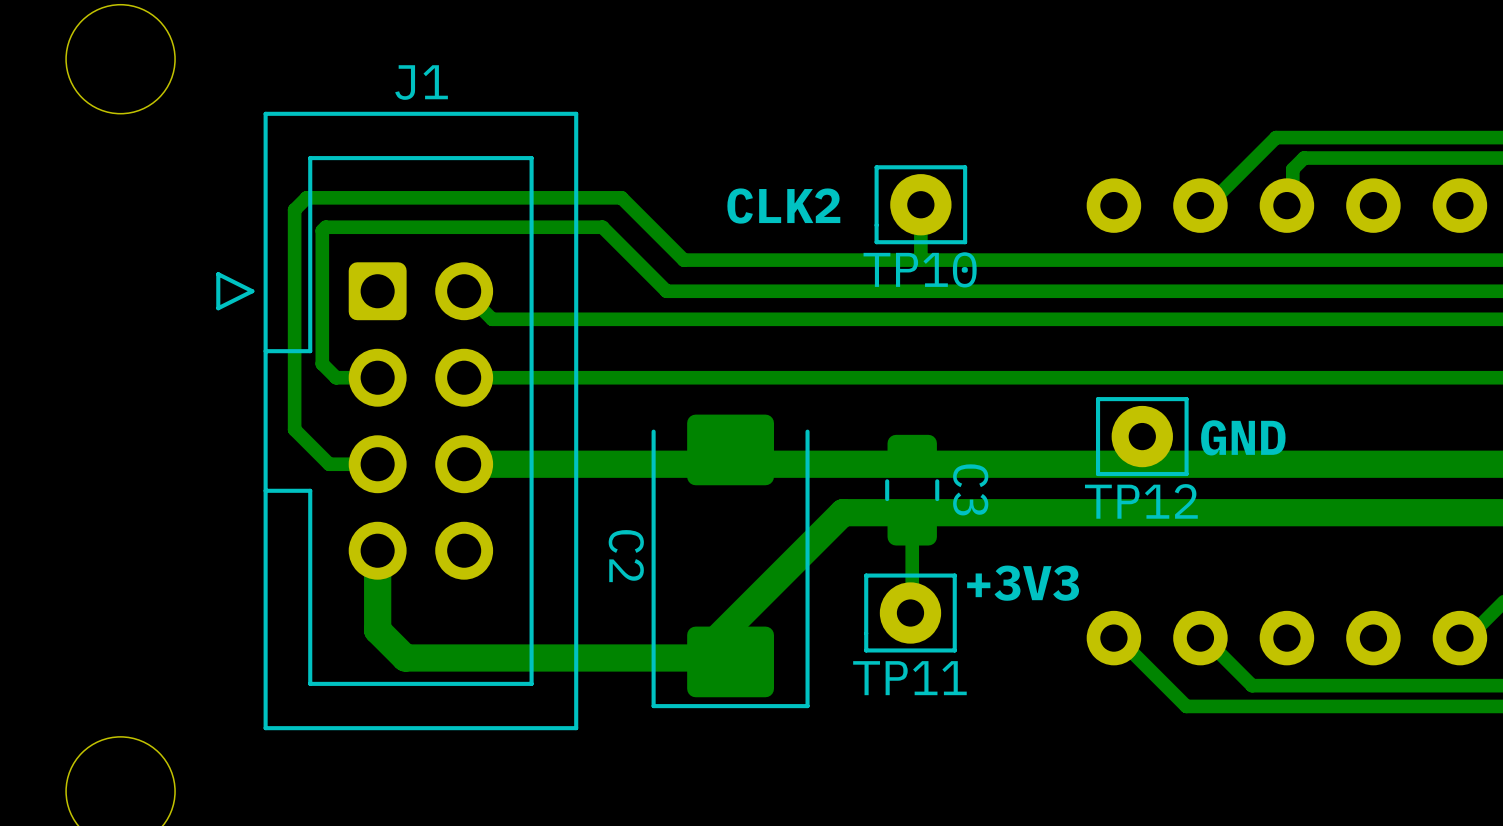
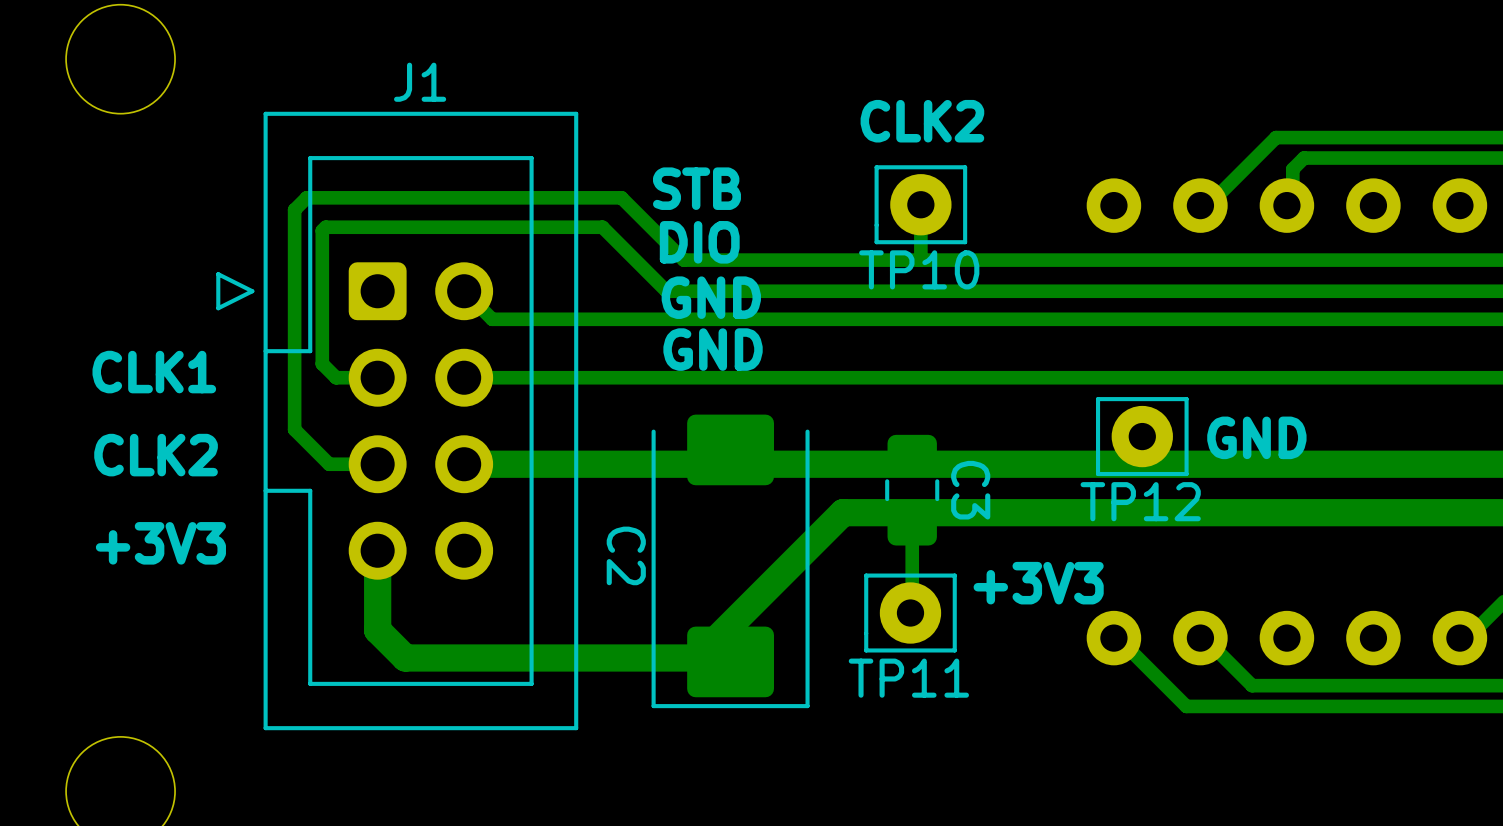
text: none -> STB (696, 188)
text position: CLK2 (783, 206) -> CLK2 (922, 121)
text: none -> DIO (699, 242)
text: none -> GND (711, 297)
text: none -> GND (713, 349)
text: none -> CLK1 (154, 372)
text: none -> CLK2 (156, 455)
text: none -> +3V3 (160, 543)

